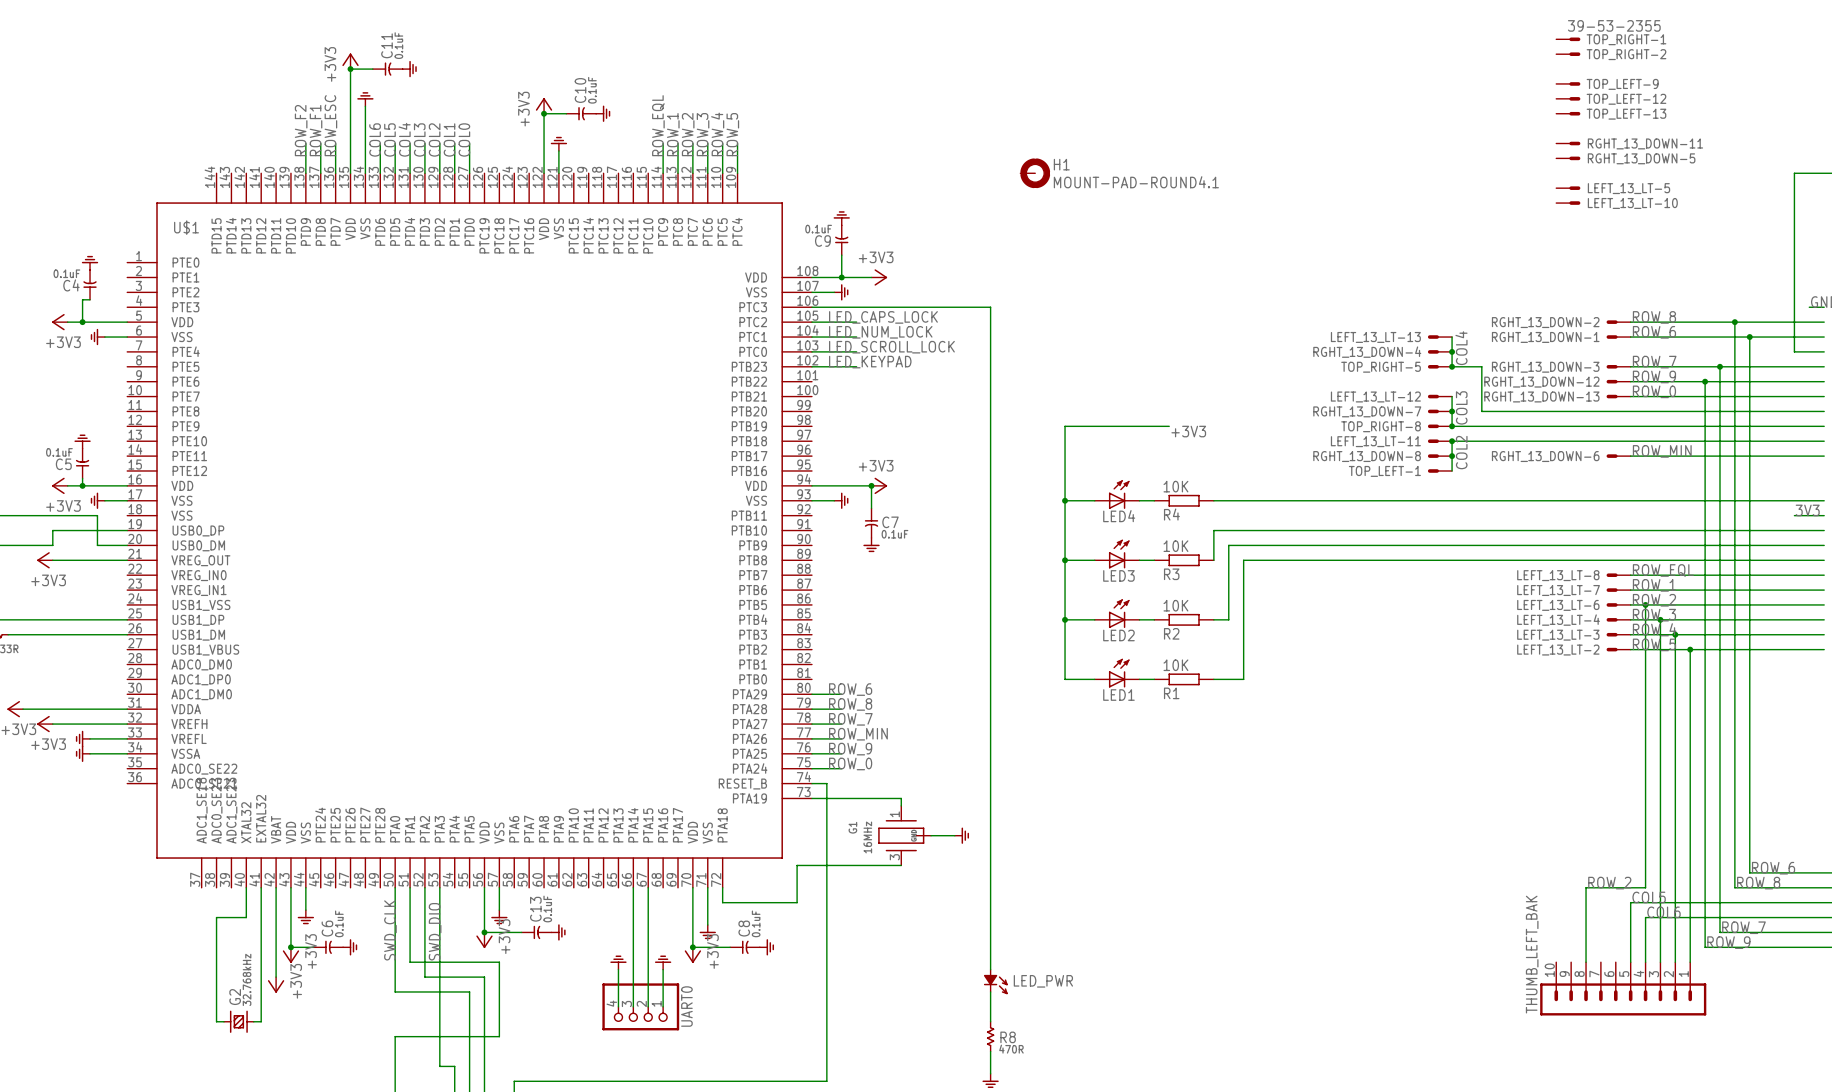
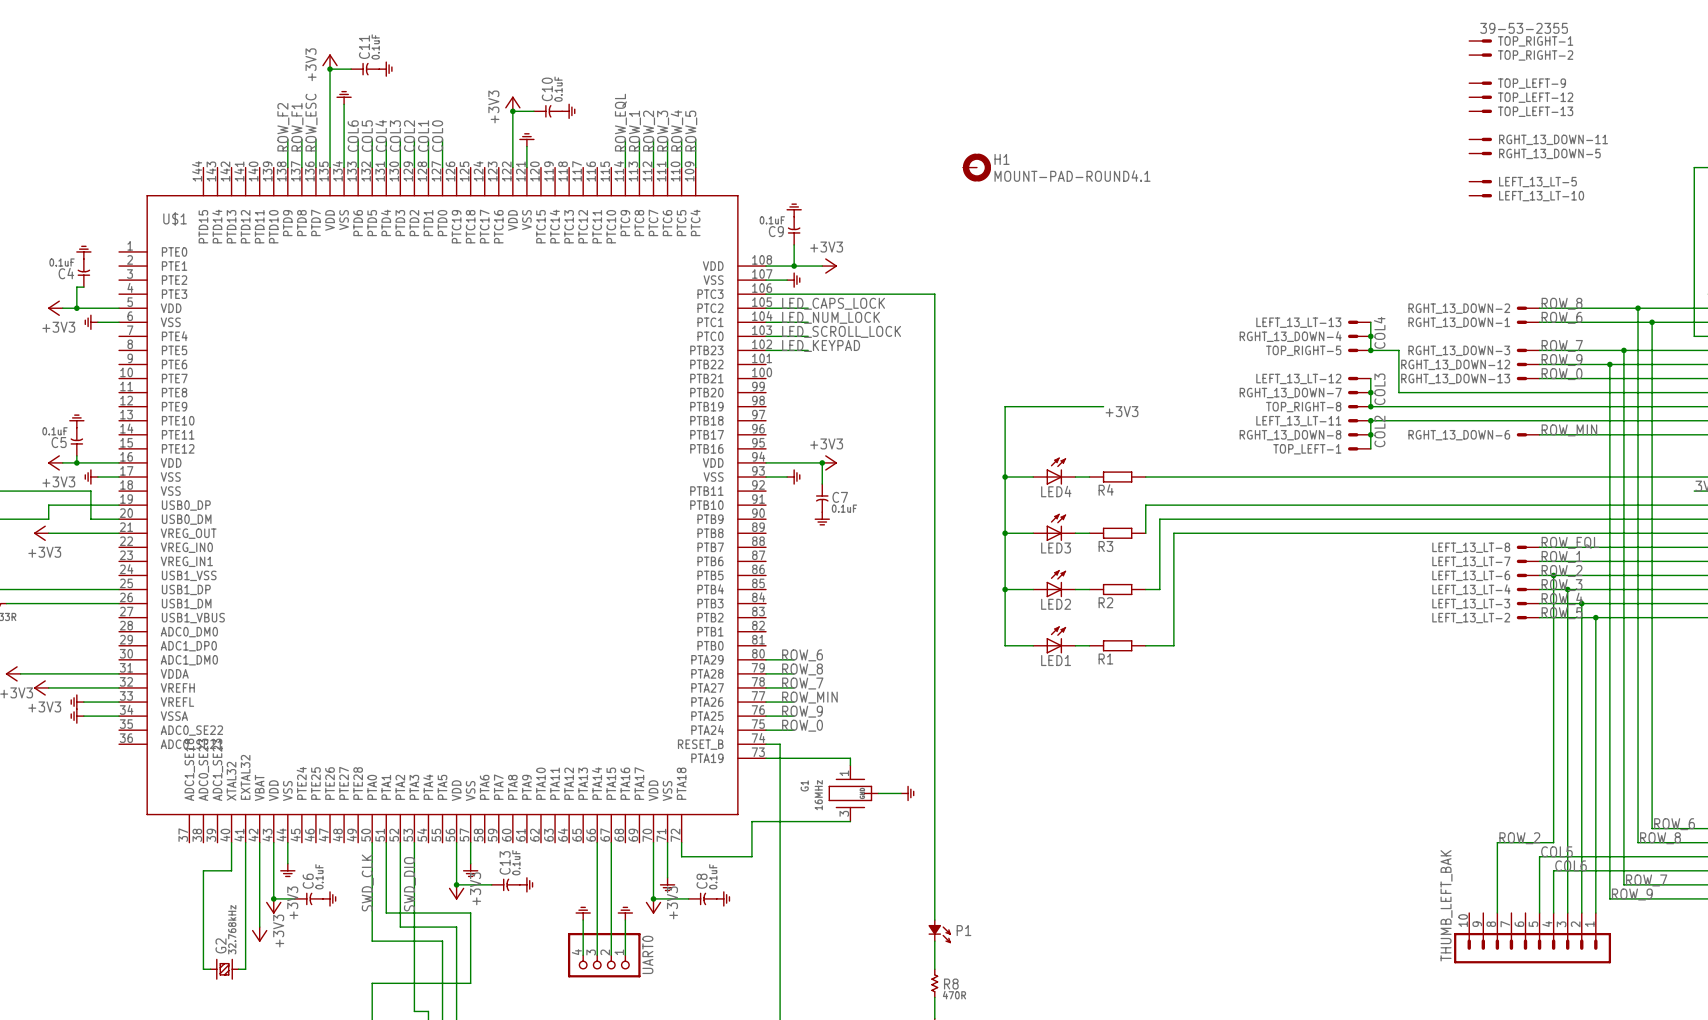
R4 value: 10K (1175, 486) -> none
R3 value: 10K (1175, 546) -> none
R2 value: 10K (1175, 605) -> none
R1 value: 10K (1175, 665) -> none
LED_PWR name: LED_PWR (1043, 981) -> P1 (963, 930)

